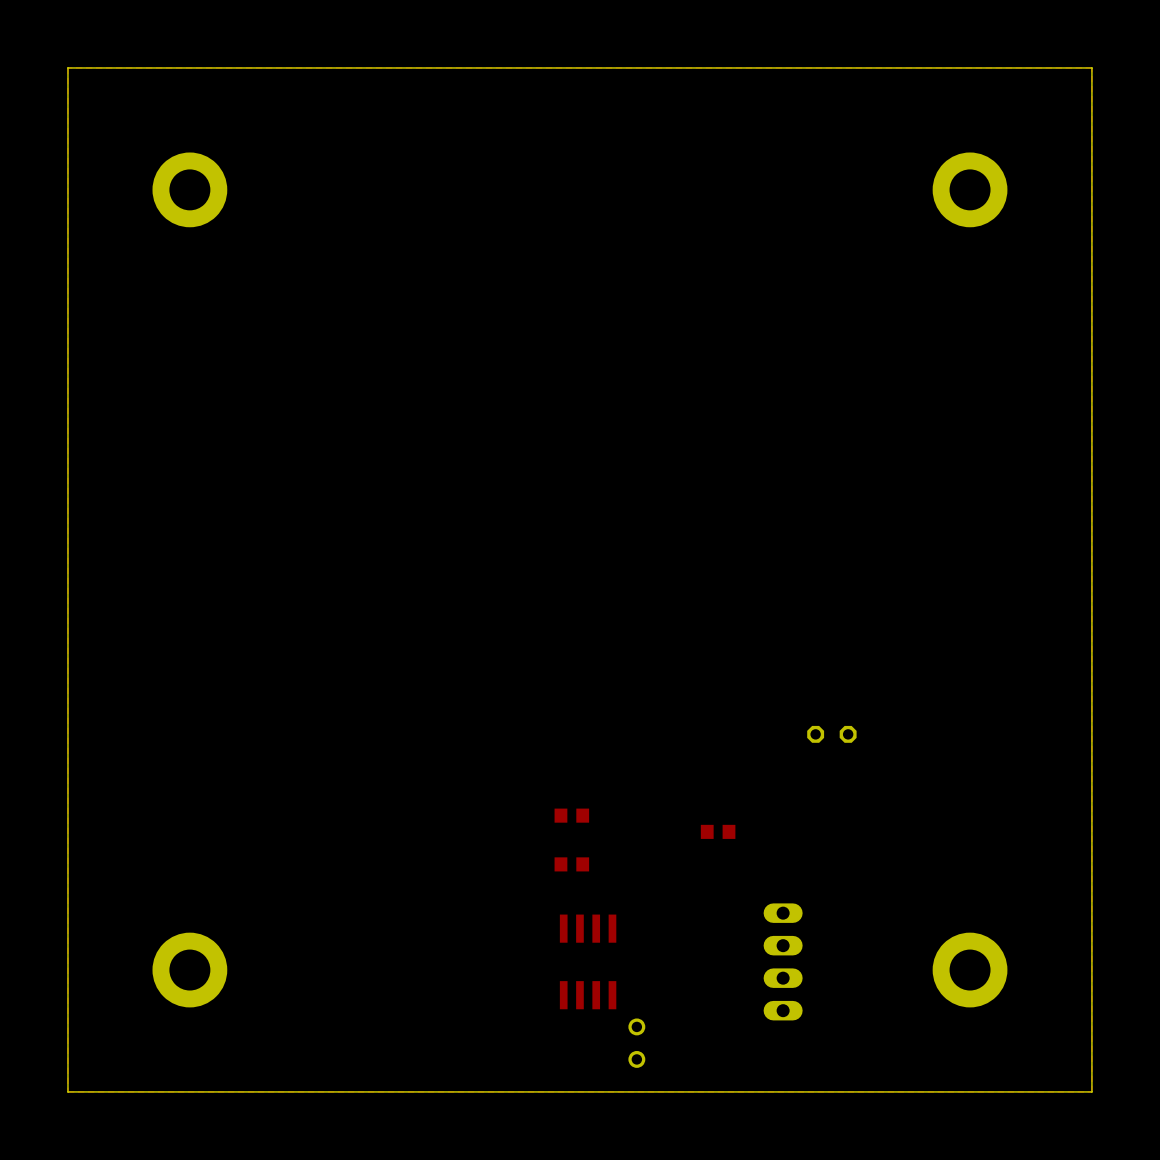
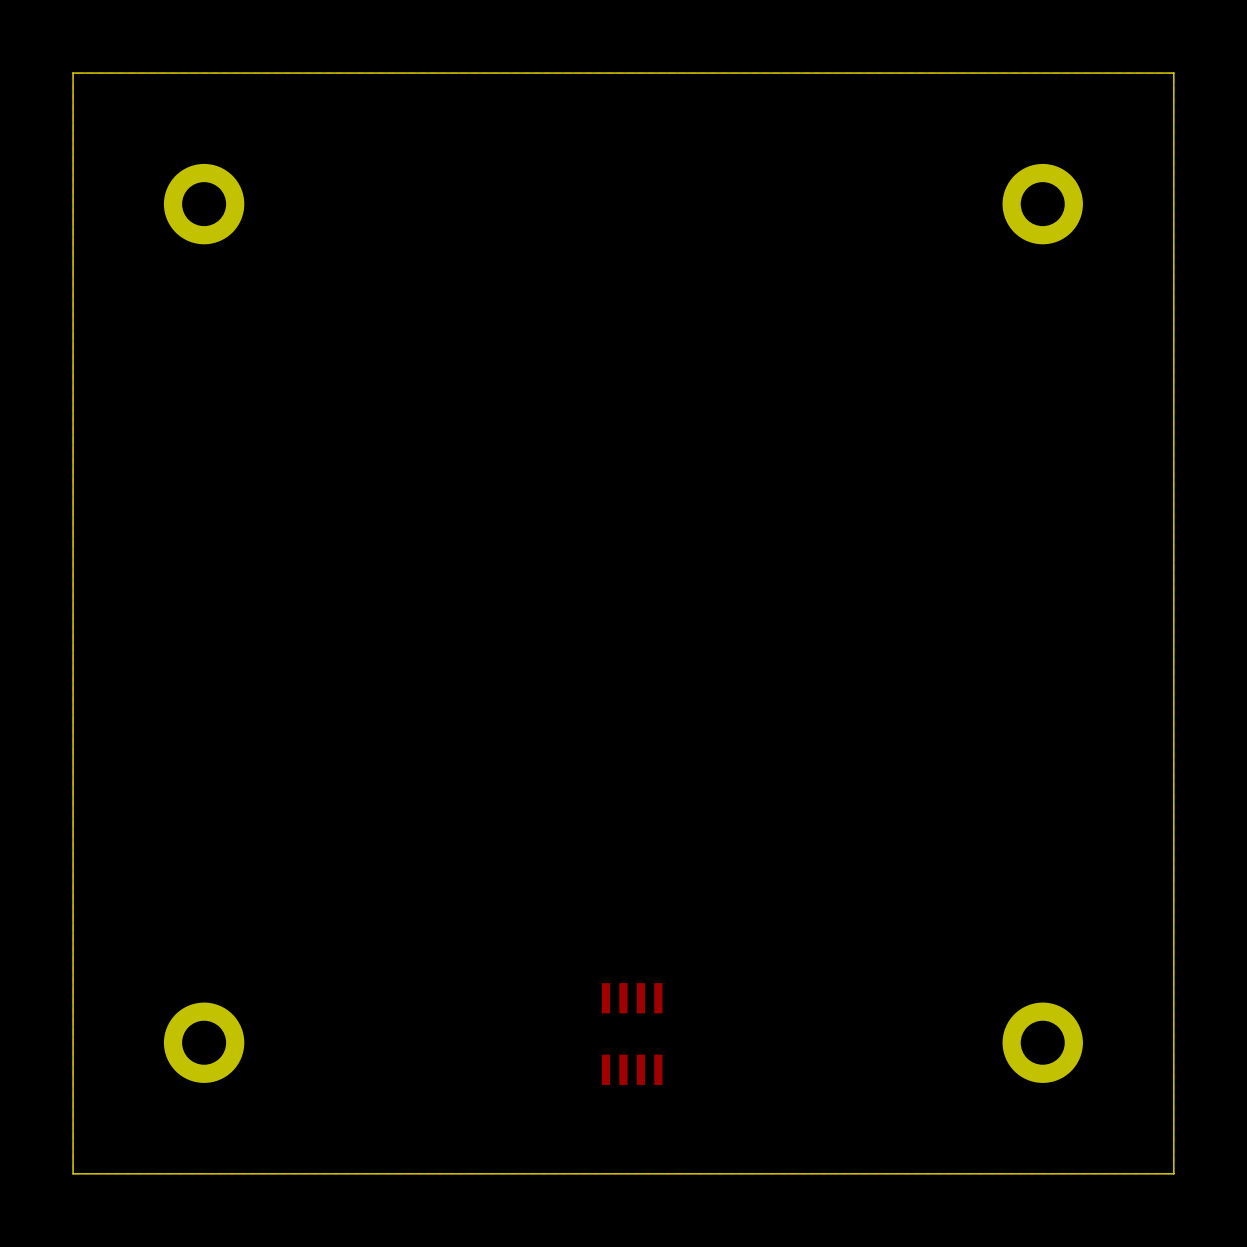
part: (831, 734) -> none
part: (571, 815) -> none
part: (718, 831) -> none
part: (571, 864) -> none
part: (783, 961) -> none
part: (636, 1043) -> none

